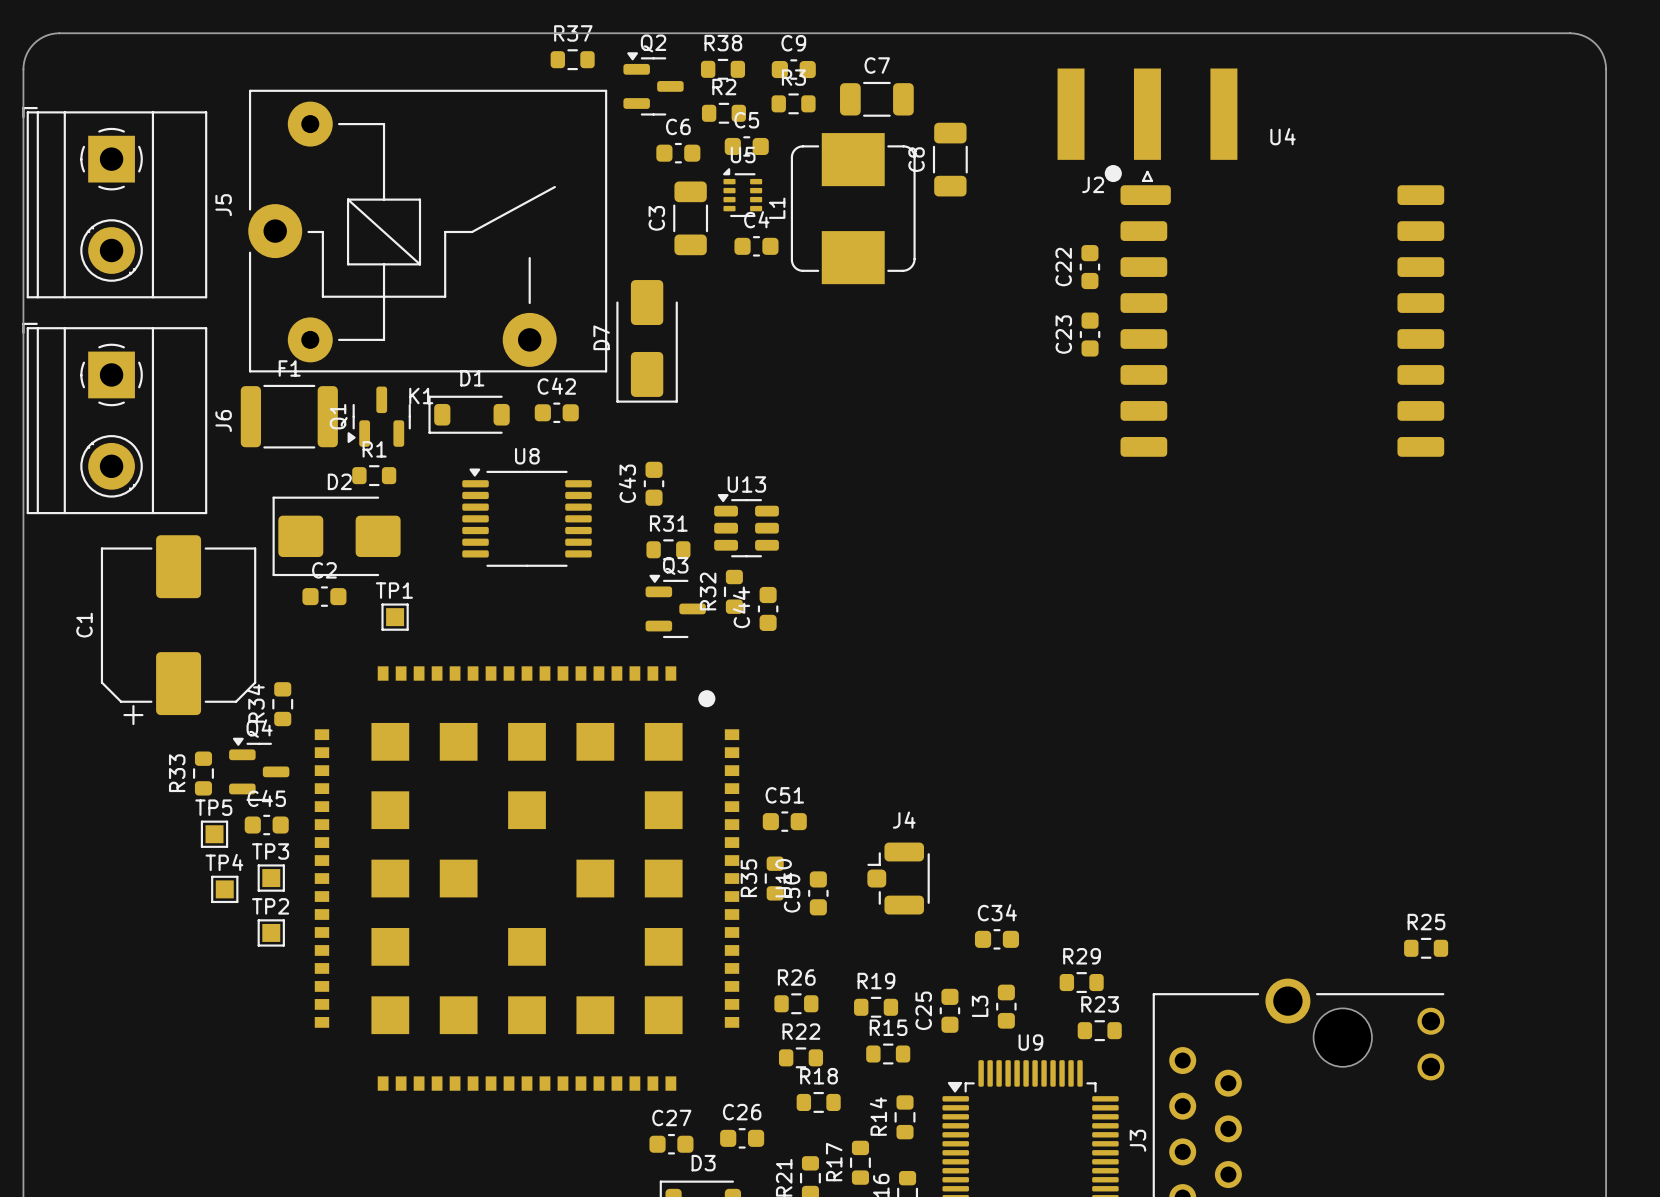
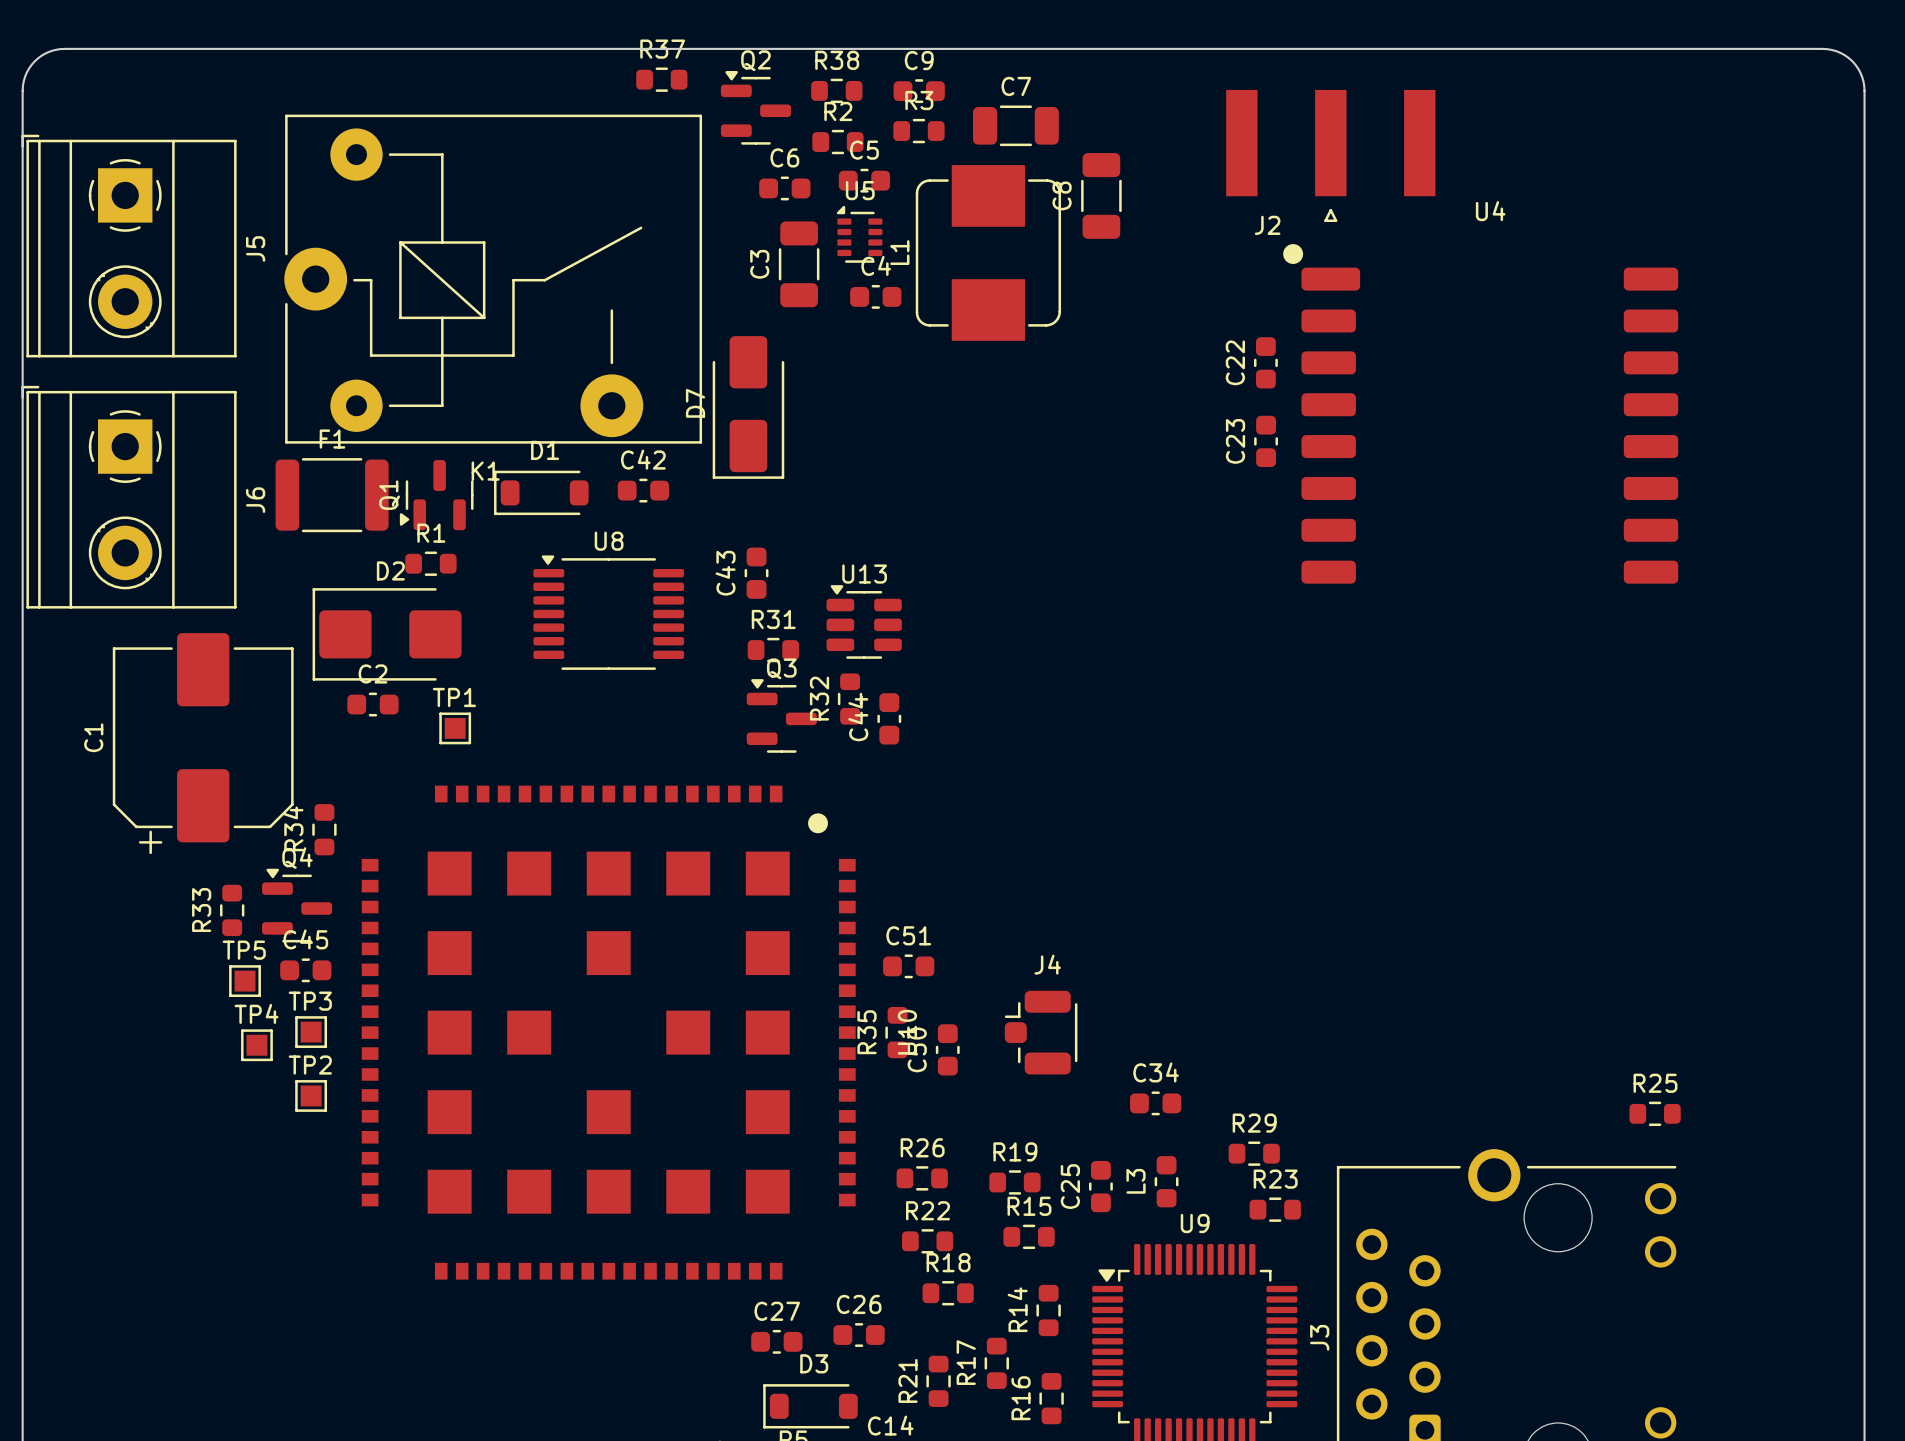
C22 position: (1089, 267) -> (1265, 362)
U4 position: (1274, 310) -> (1480, 413)
C23 position: (1090, 334) -> (1266, 441)

